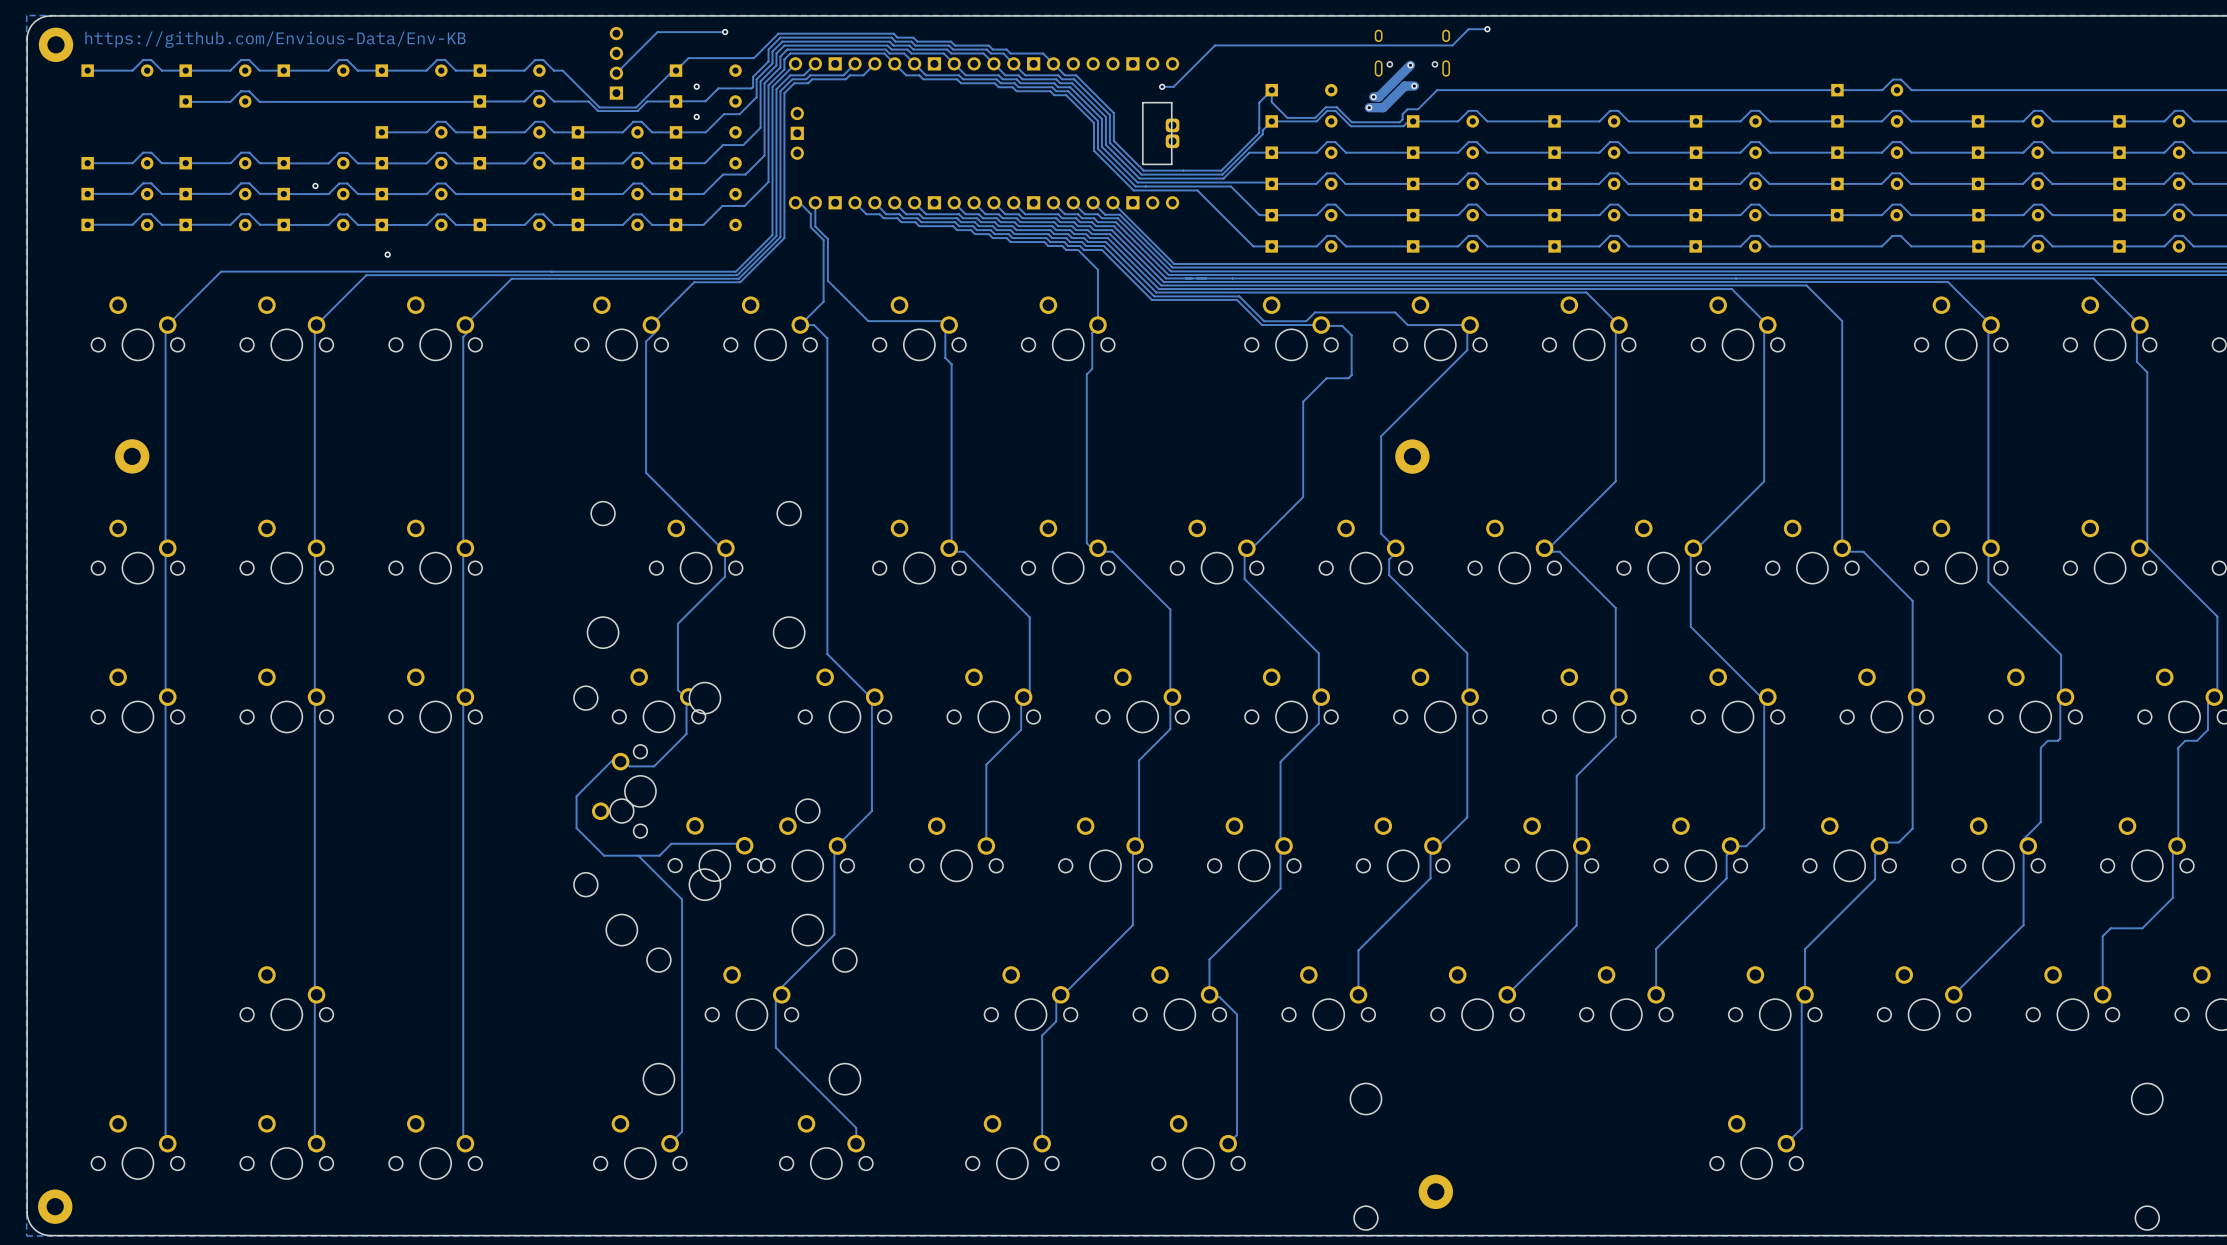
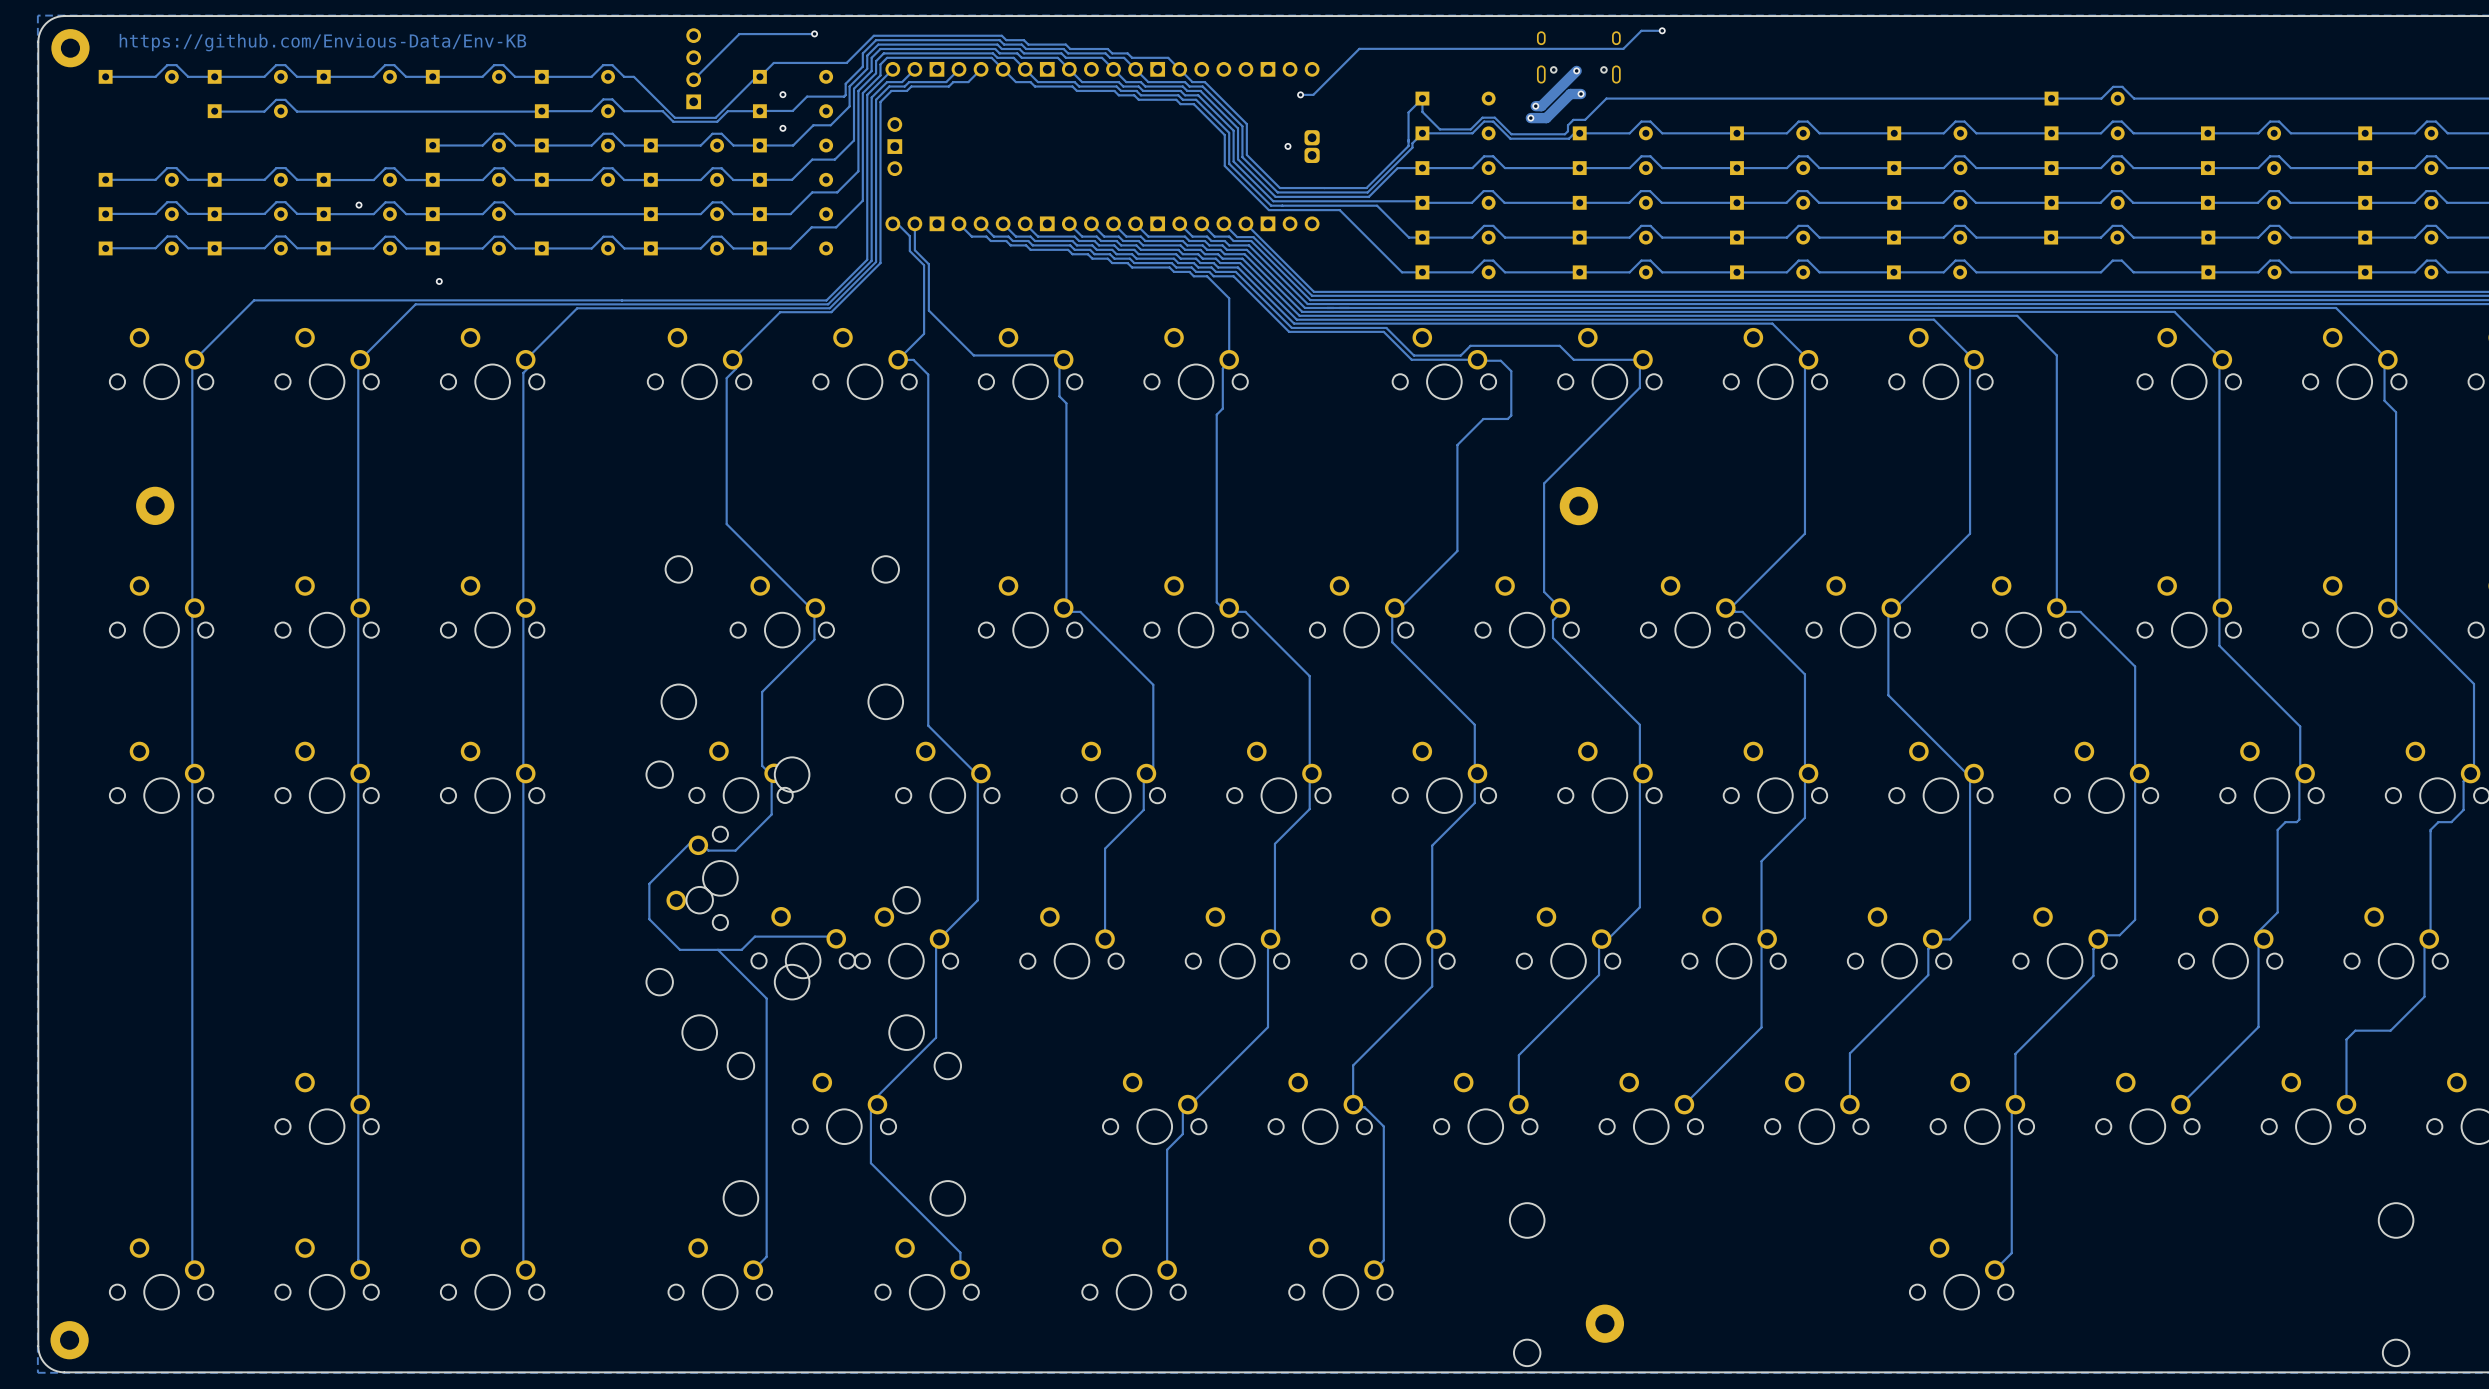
board edge: (1171, 102) (1142, 102) (1142, 164) (1171, 164) (1171, 102) -> none
via: none -> (1287, 146)

